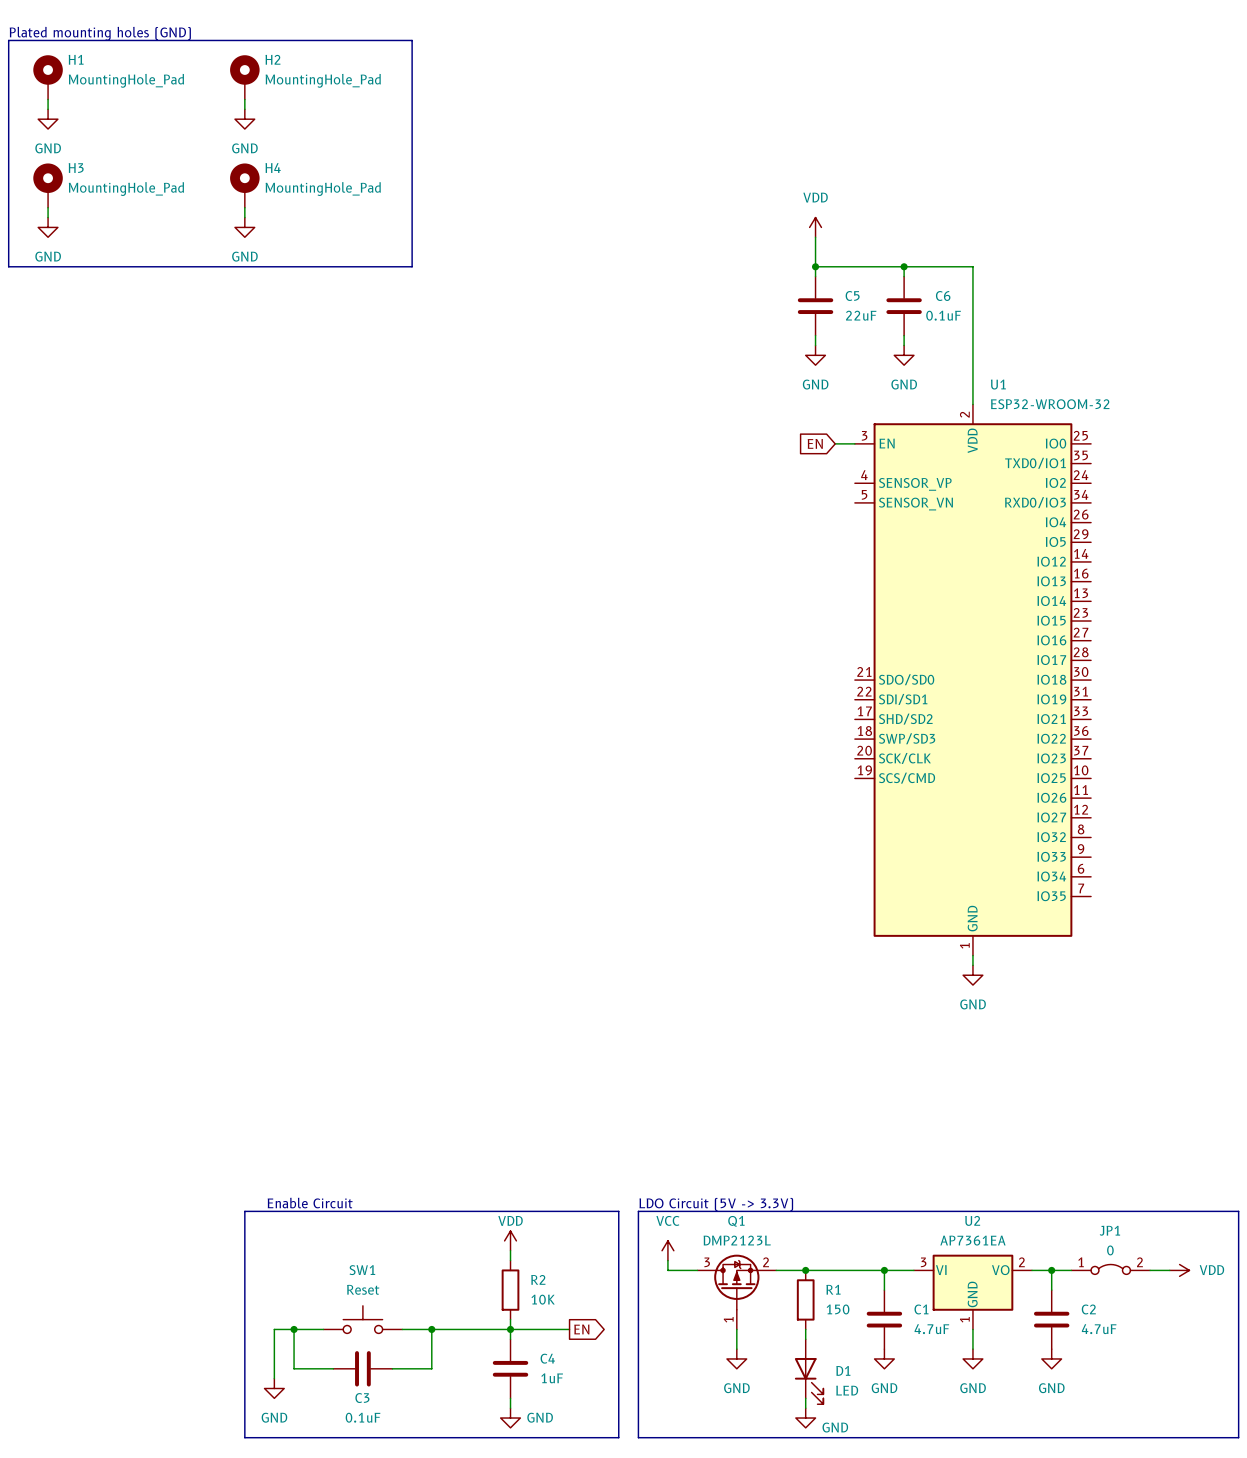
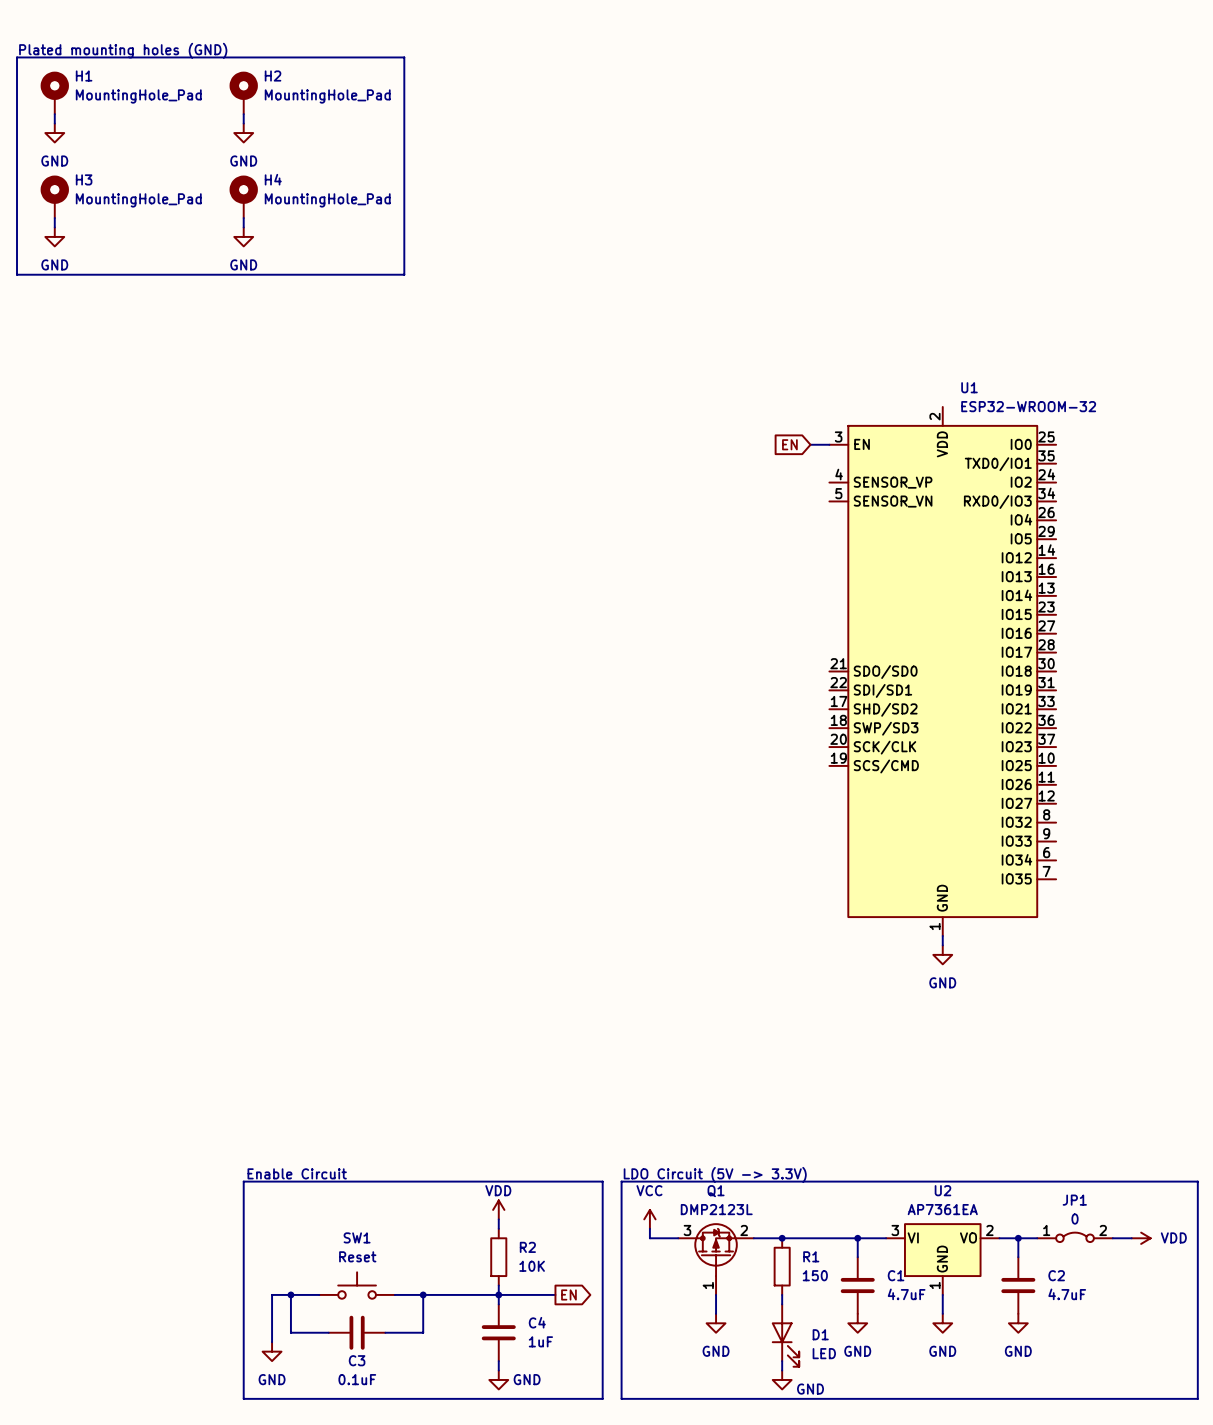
power symbol: VDD (815, 227) -> none
wire: (815, 237) (815, 276) -> none
wire: (815, 266) (972, 266) (972, 404) -> none
junction: (815, 266) -> none
wire: (904, 266) (904, 276) -> none
junction: (904, 266) -> none
C5: 22uF (815, 306) -> none
C6: 0.1uF (904, 306) -> none
wire: (815, 335) (815, 345) -> none
wire: (904, 335) (904, 345) -> none
power symbol: GND (815, 355) -> none
power symbol: GND (904, 355) -> none

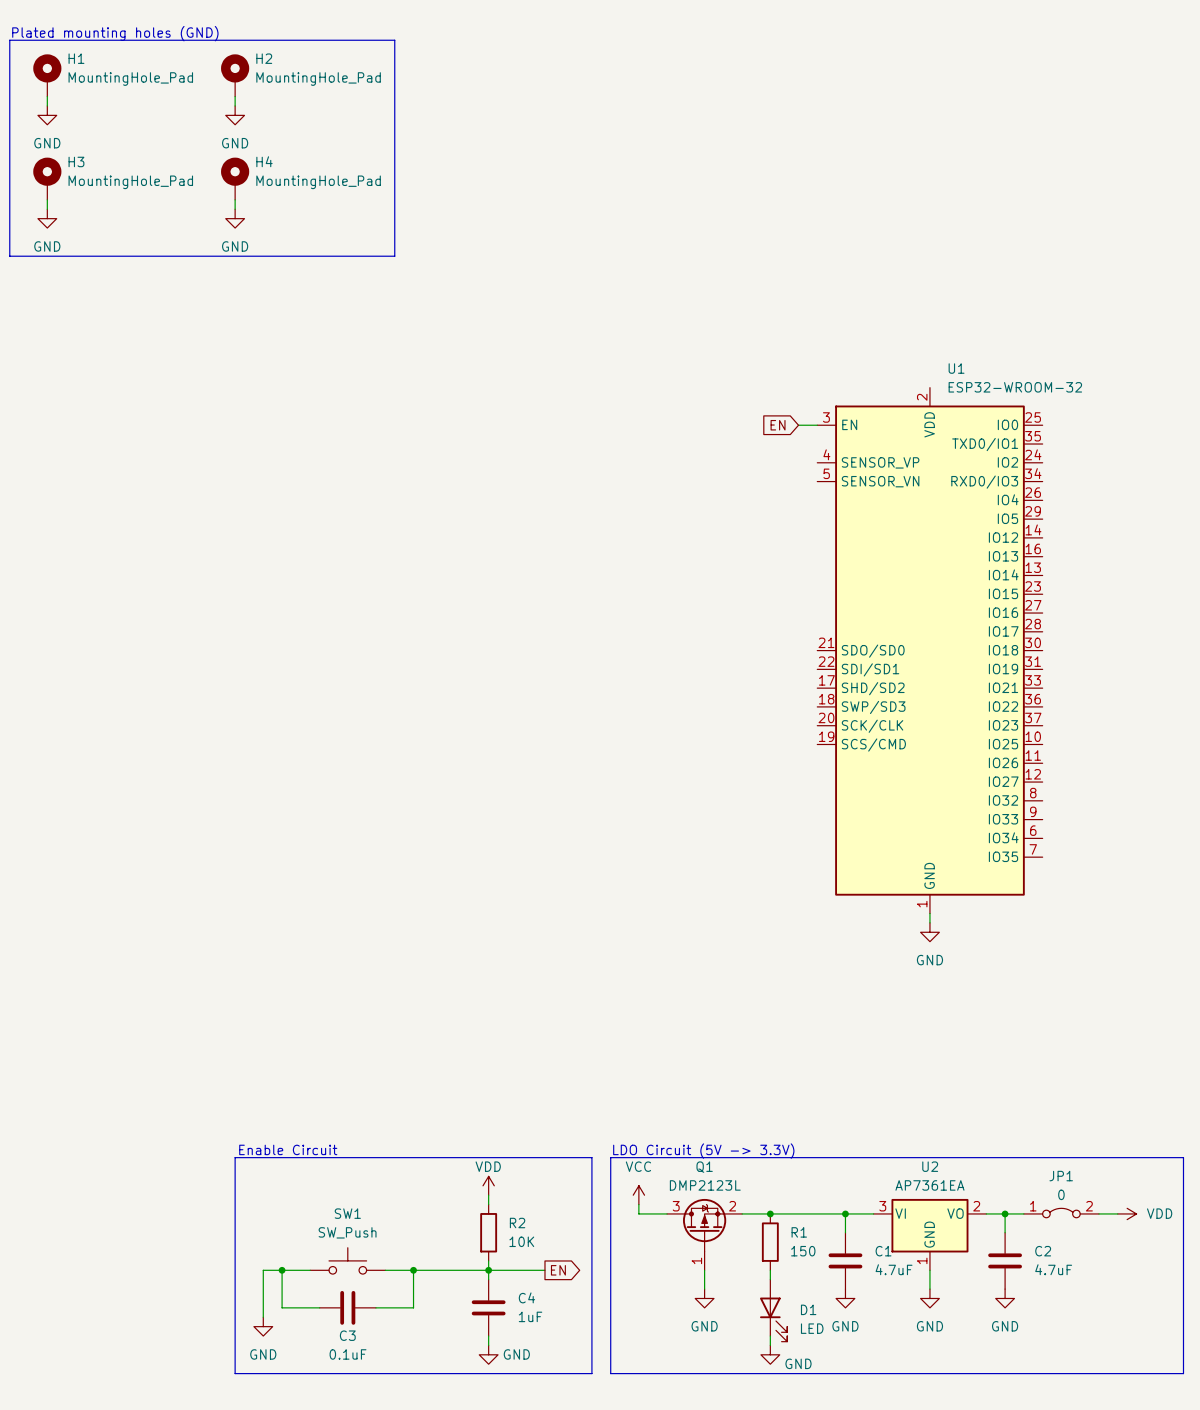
SW1 value: Reset (357, 1256) -> SW_Push (347, 1232)

